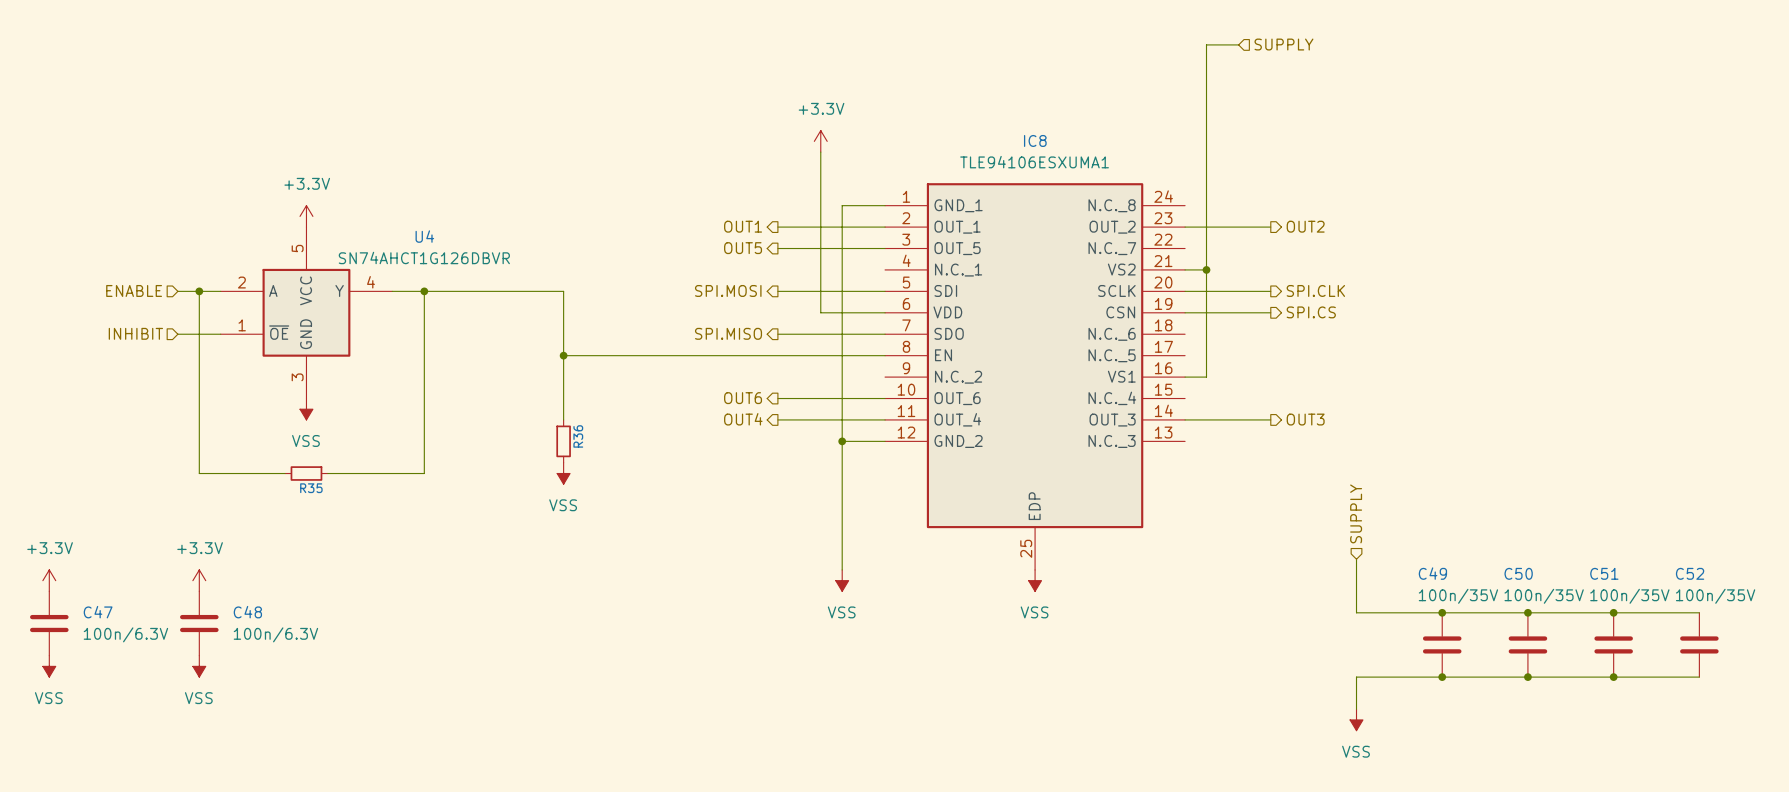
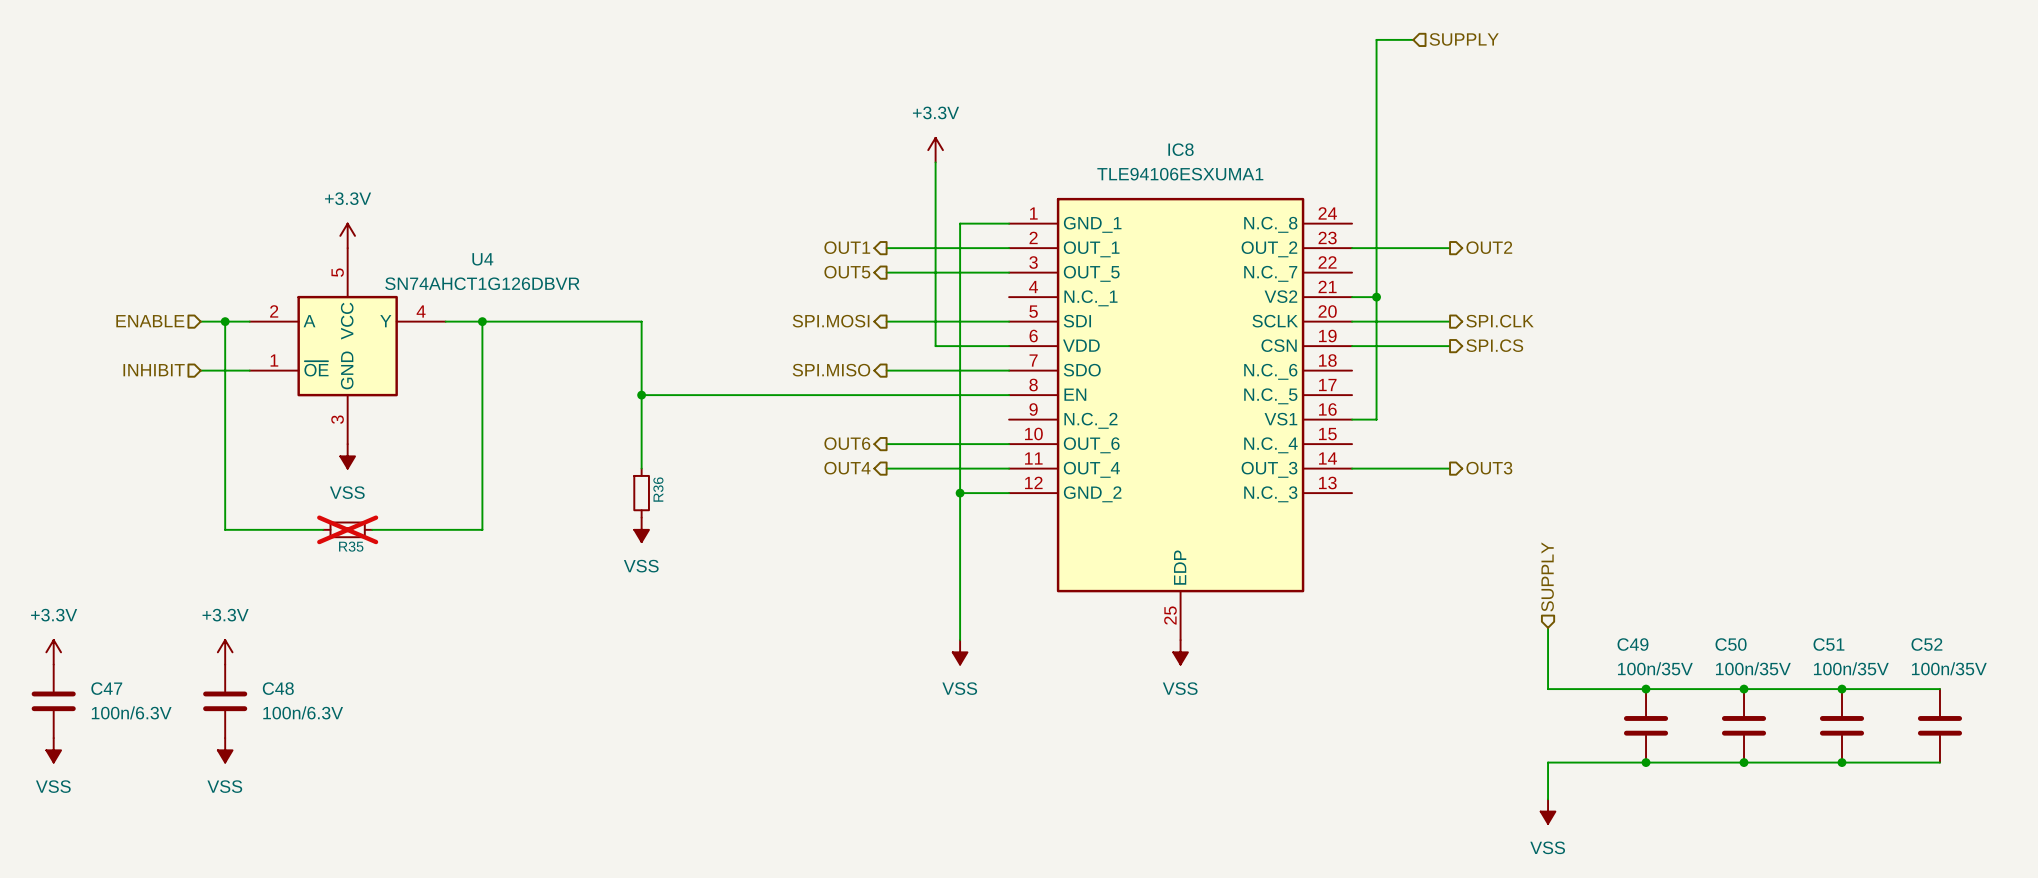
R35 do-not-place cross: none -> (347, 529)

